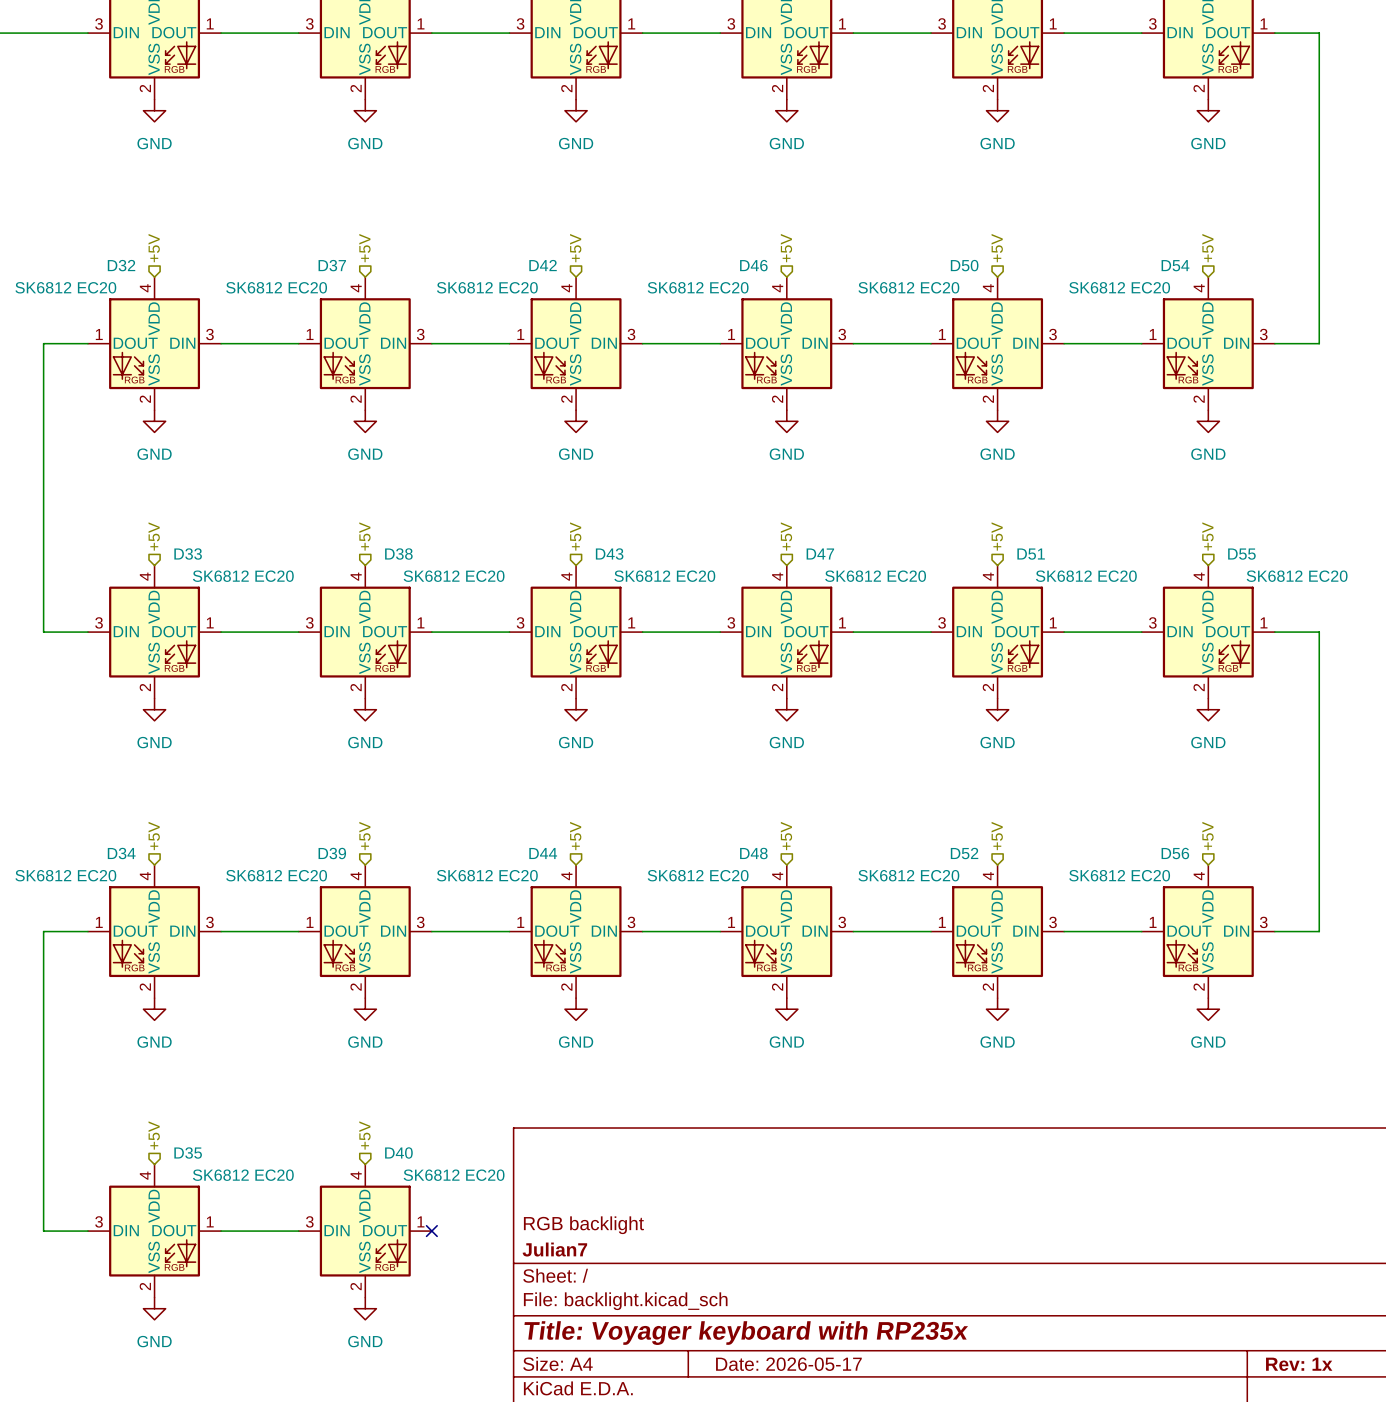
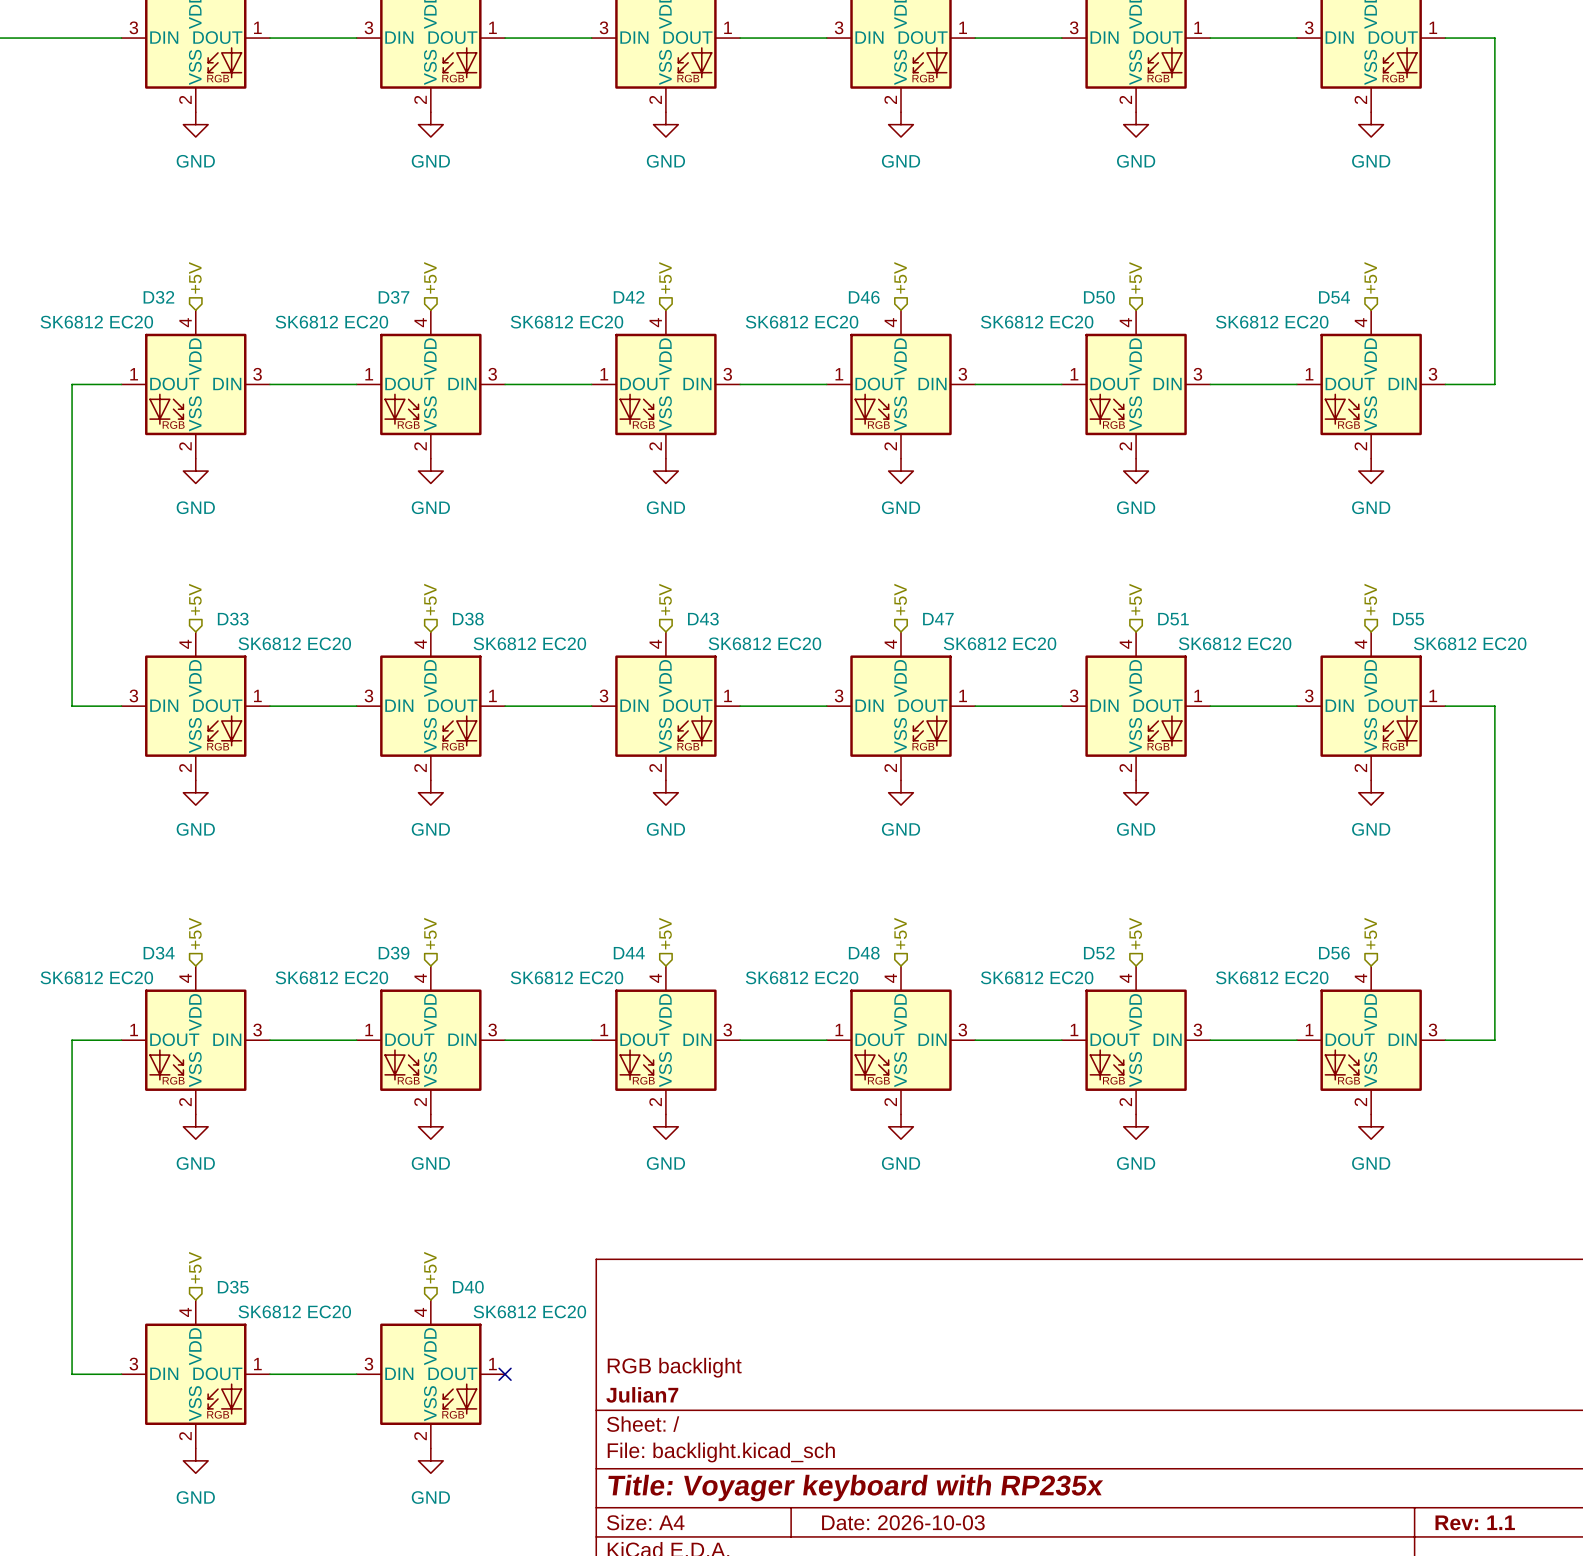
title block: Date: 2026-05-17 (788, 1364) -> Date: 2026-10-03 (903, 1522)
title block: Rev: 1x (1299, 1364) -> Rev: 1.1 (1475, 1522)

